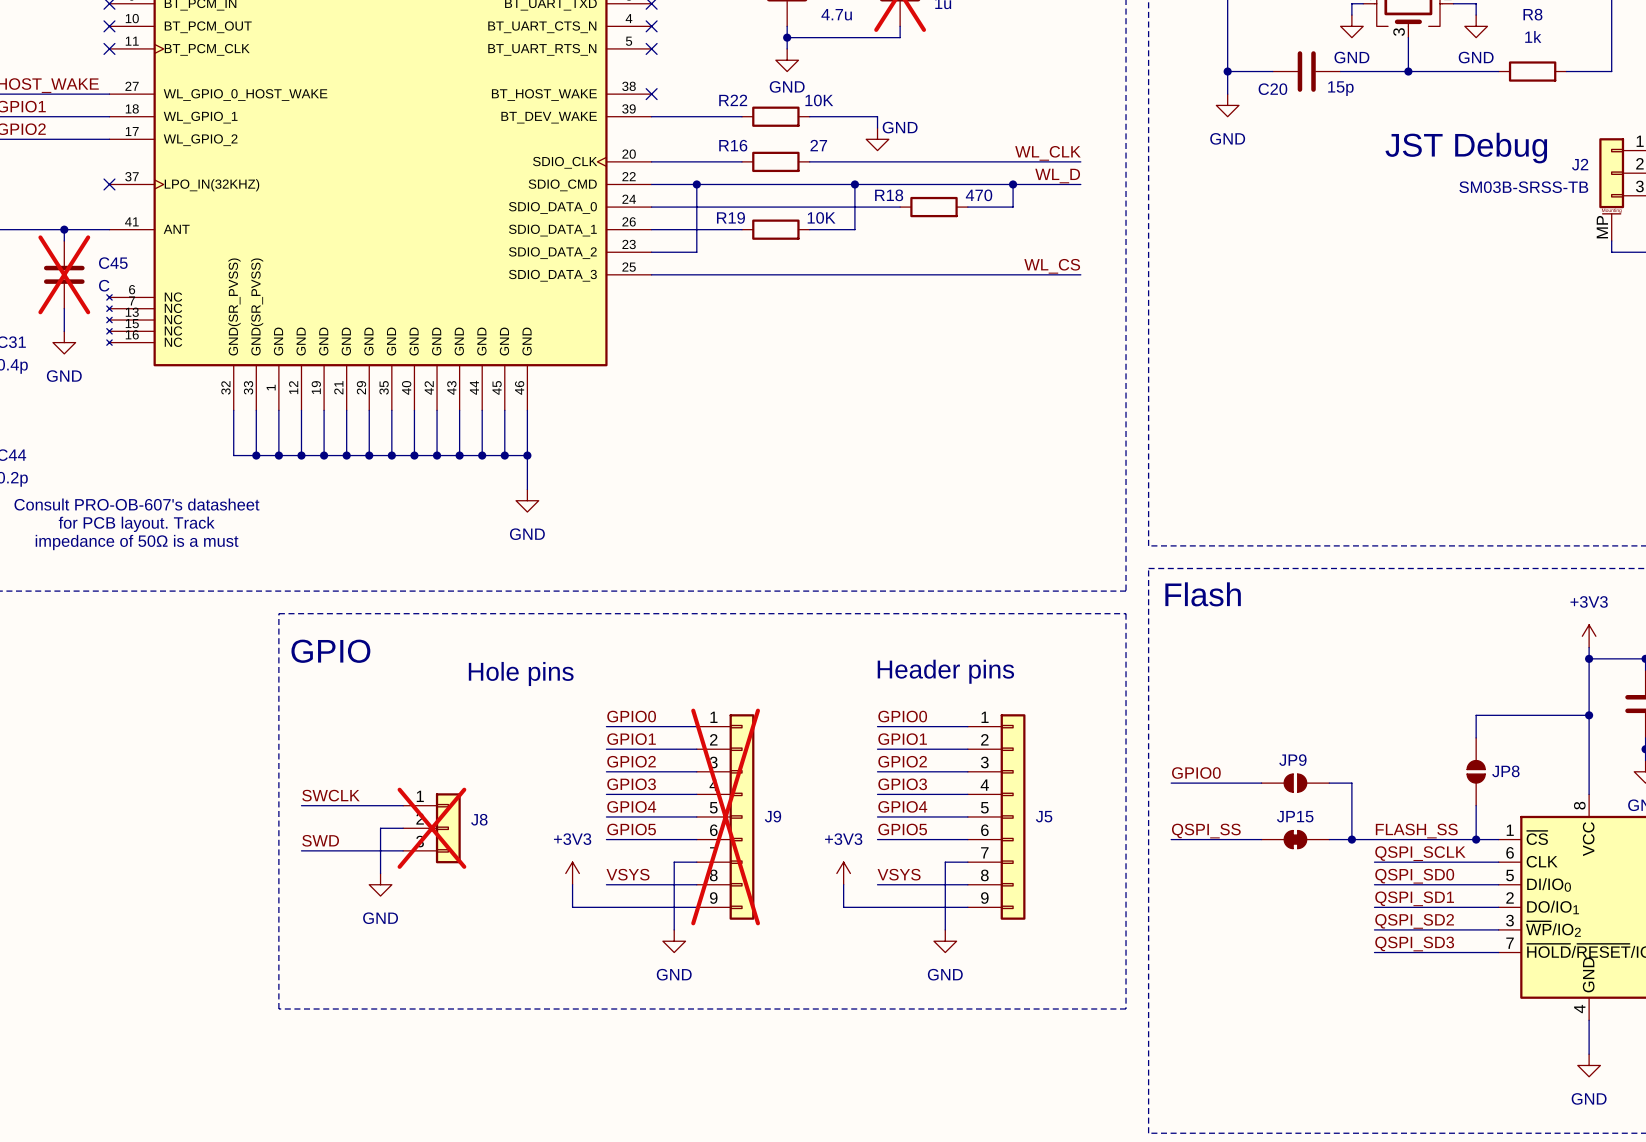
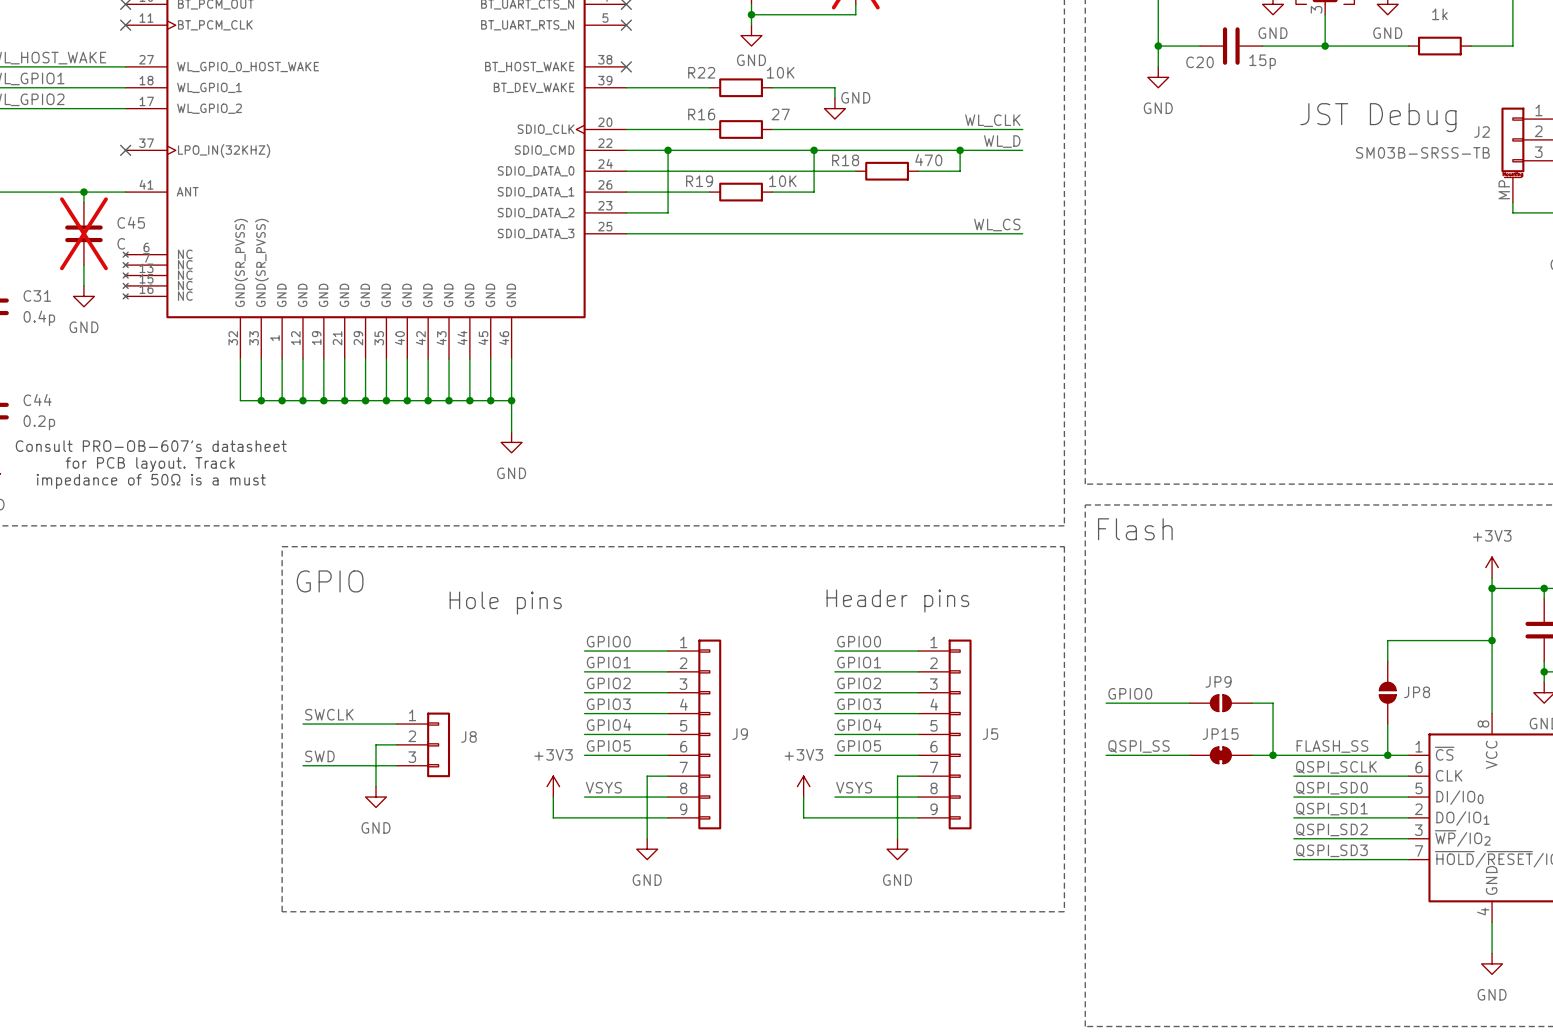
J9 do-not-place cross: (725, 816) -> none
J8 do-not-place cross: (431, 828) -> none

